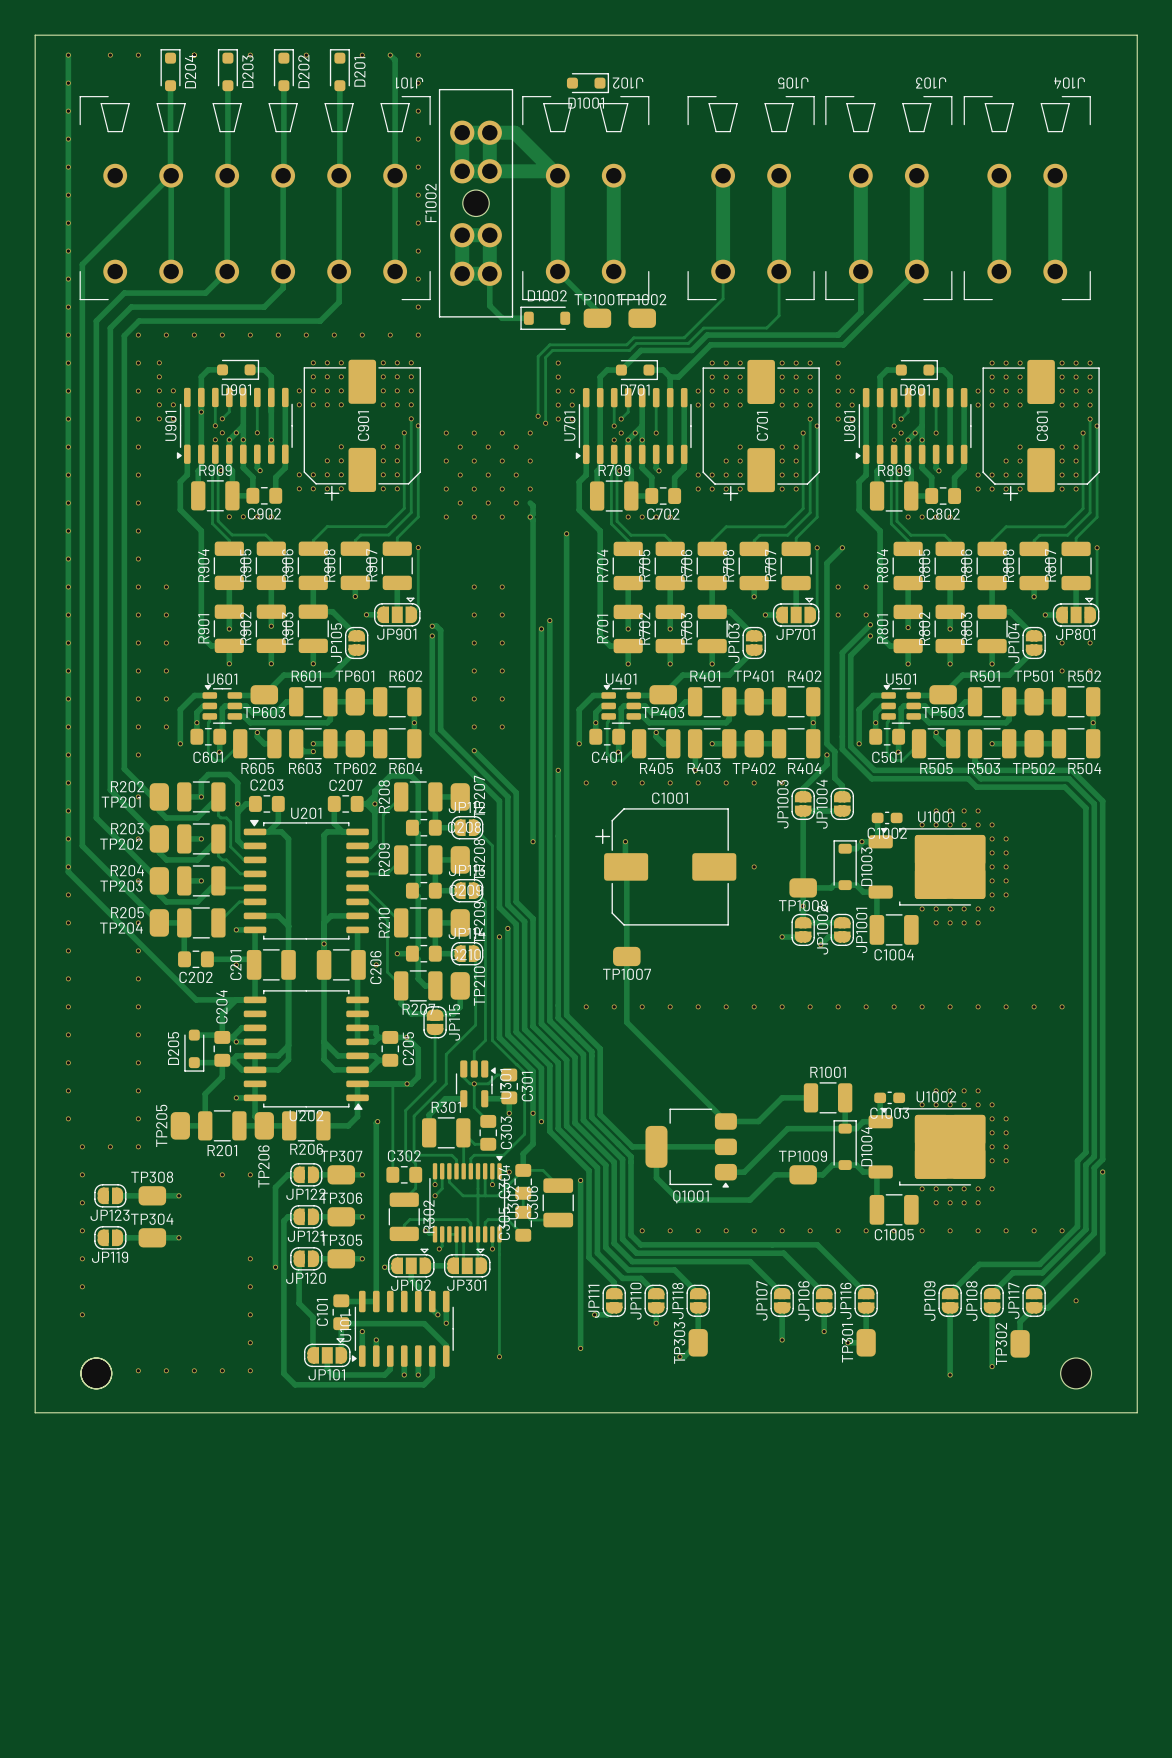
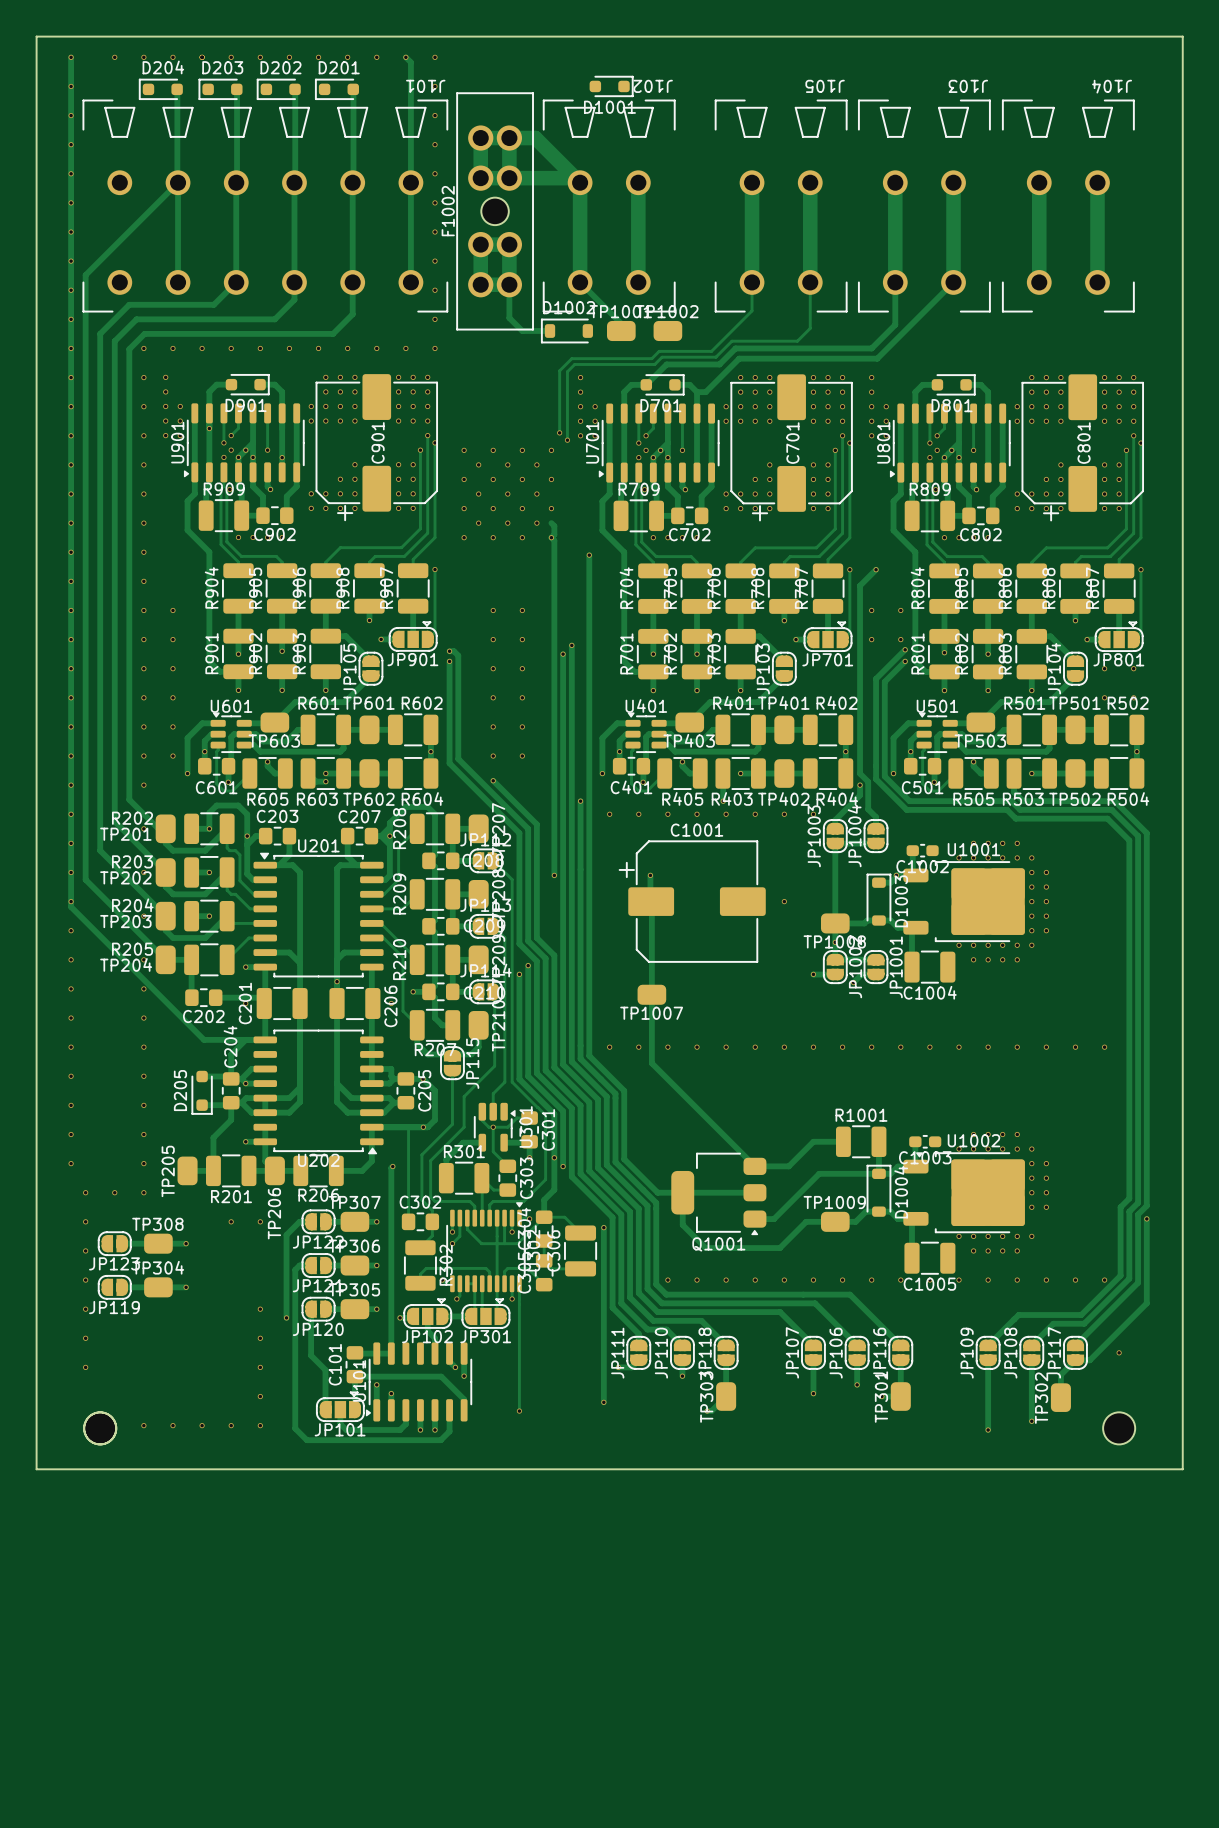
via: none -> (172, 57)
via: none -> (231, 57)
via: none -> (289, 57)
via: none -> (347, 57)
D204 rotation: 0° (170, 70) -> 90° counterclockwise (160, 89)
D203 rotation: 0° (227, 70) -> 90° counterclockwise (220, 89)
D202 rotation: 0° (283, 70) -> 90° counterclockwise (278, 89)
D201 rotation: 0° (339, 70) -> 90° counterclockwise (337, 89)

